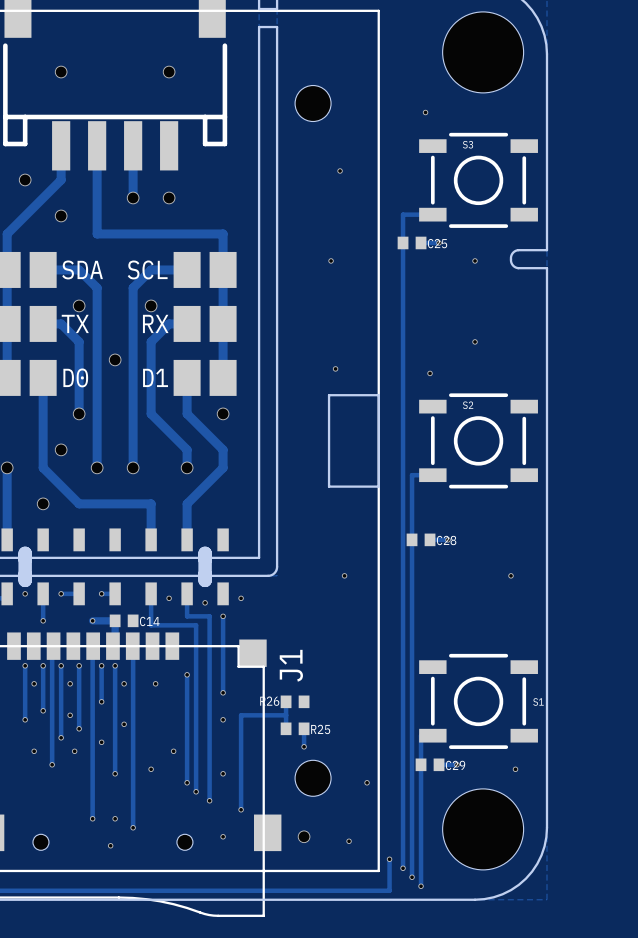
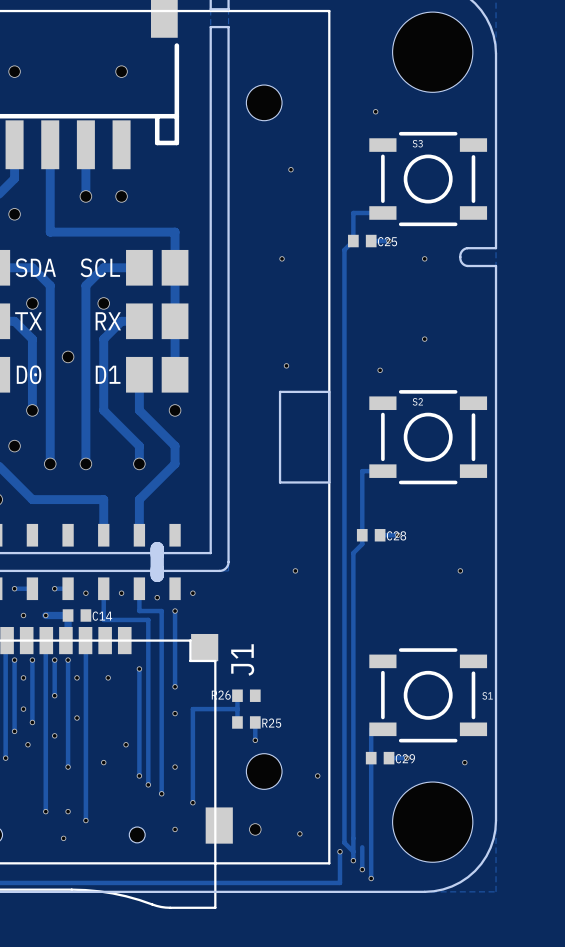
track: (403, 242) (403, 557) -> (353, 241) (344, 249) (344, 842) (353, 851)
track: (412, 548) (412, 854) -> (362, 544) (353, 553)
via: none -> (85, 593)
via: none -> (23, 615)

